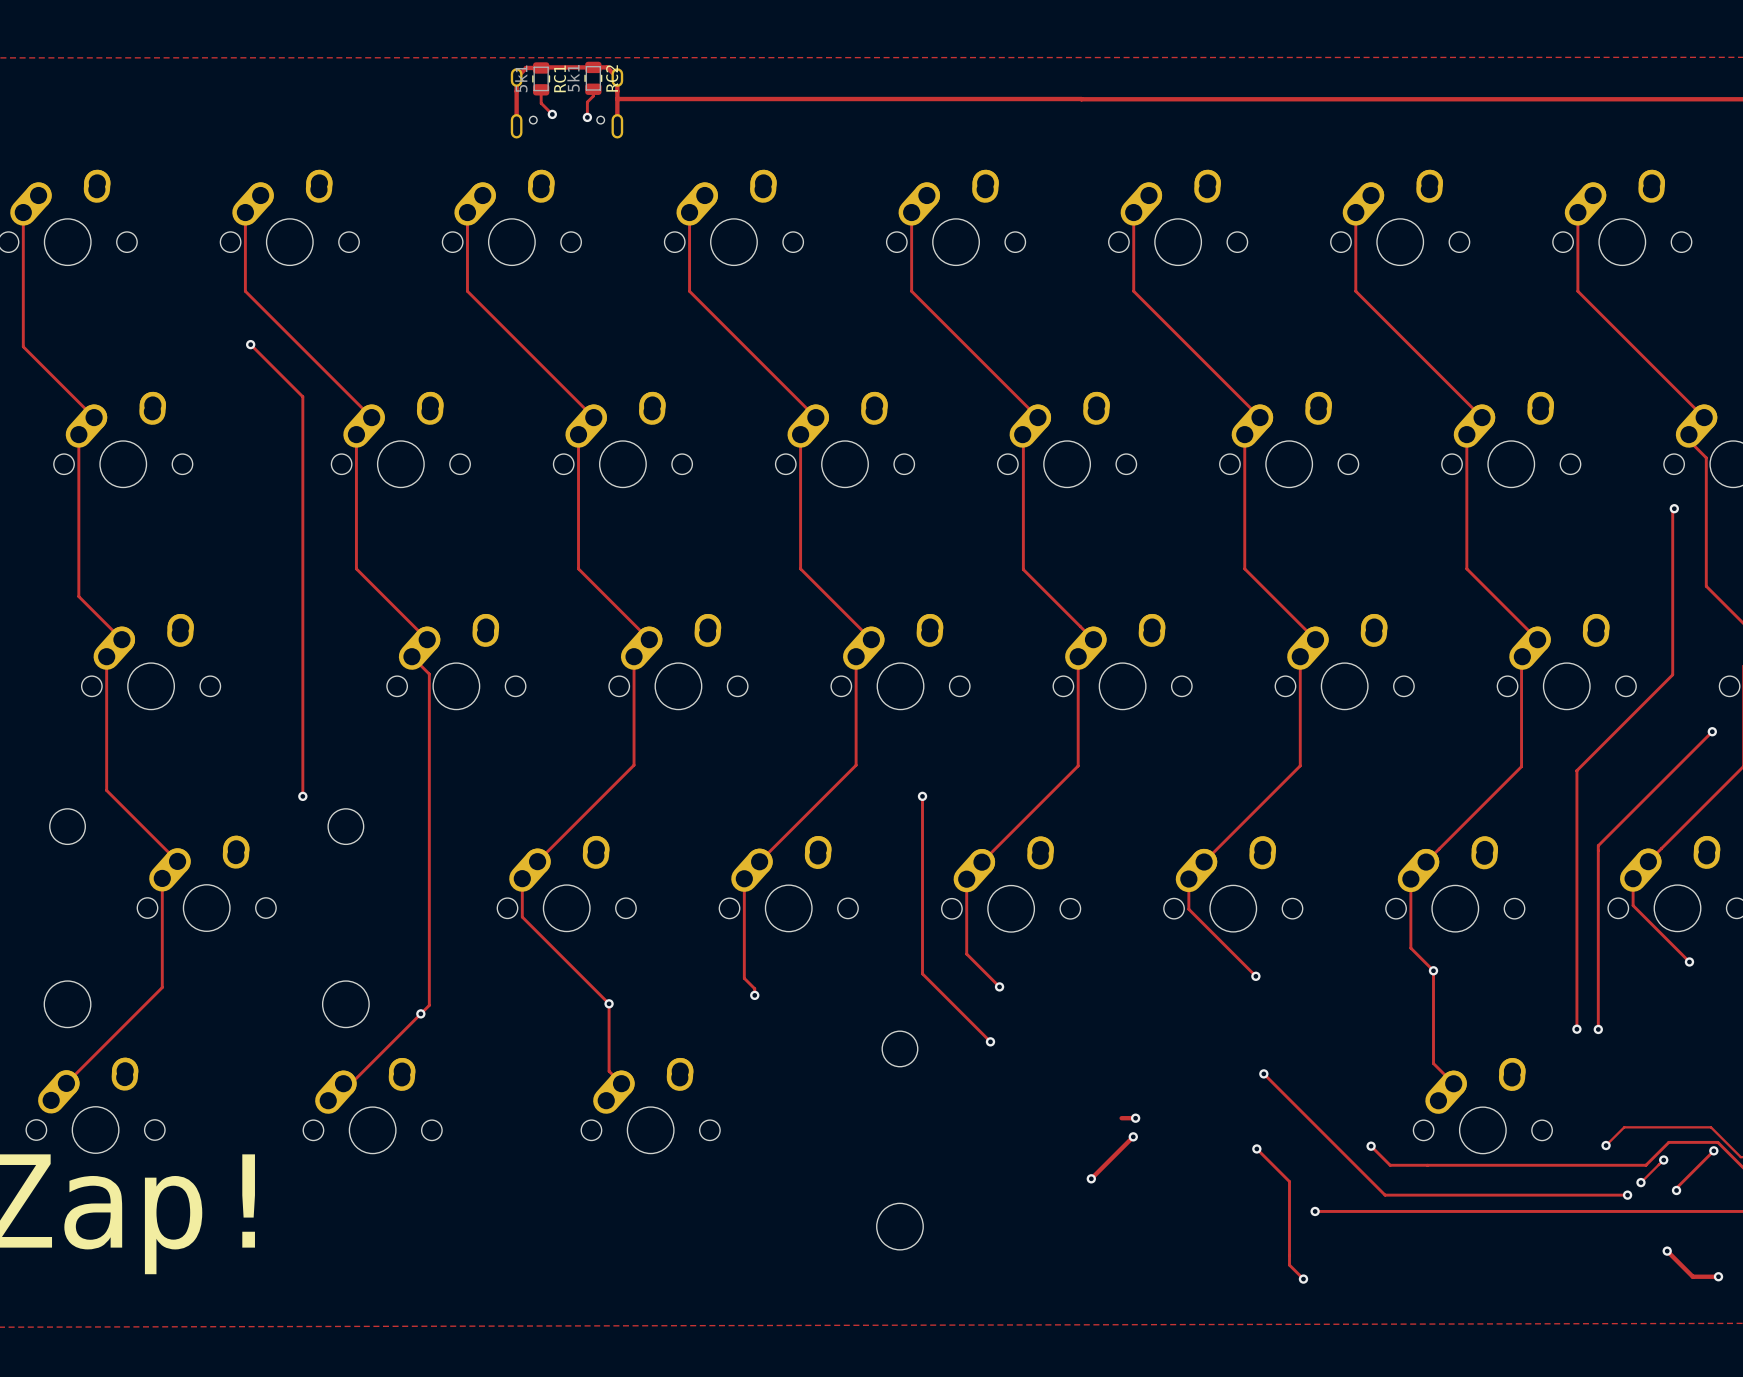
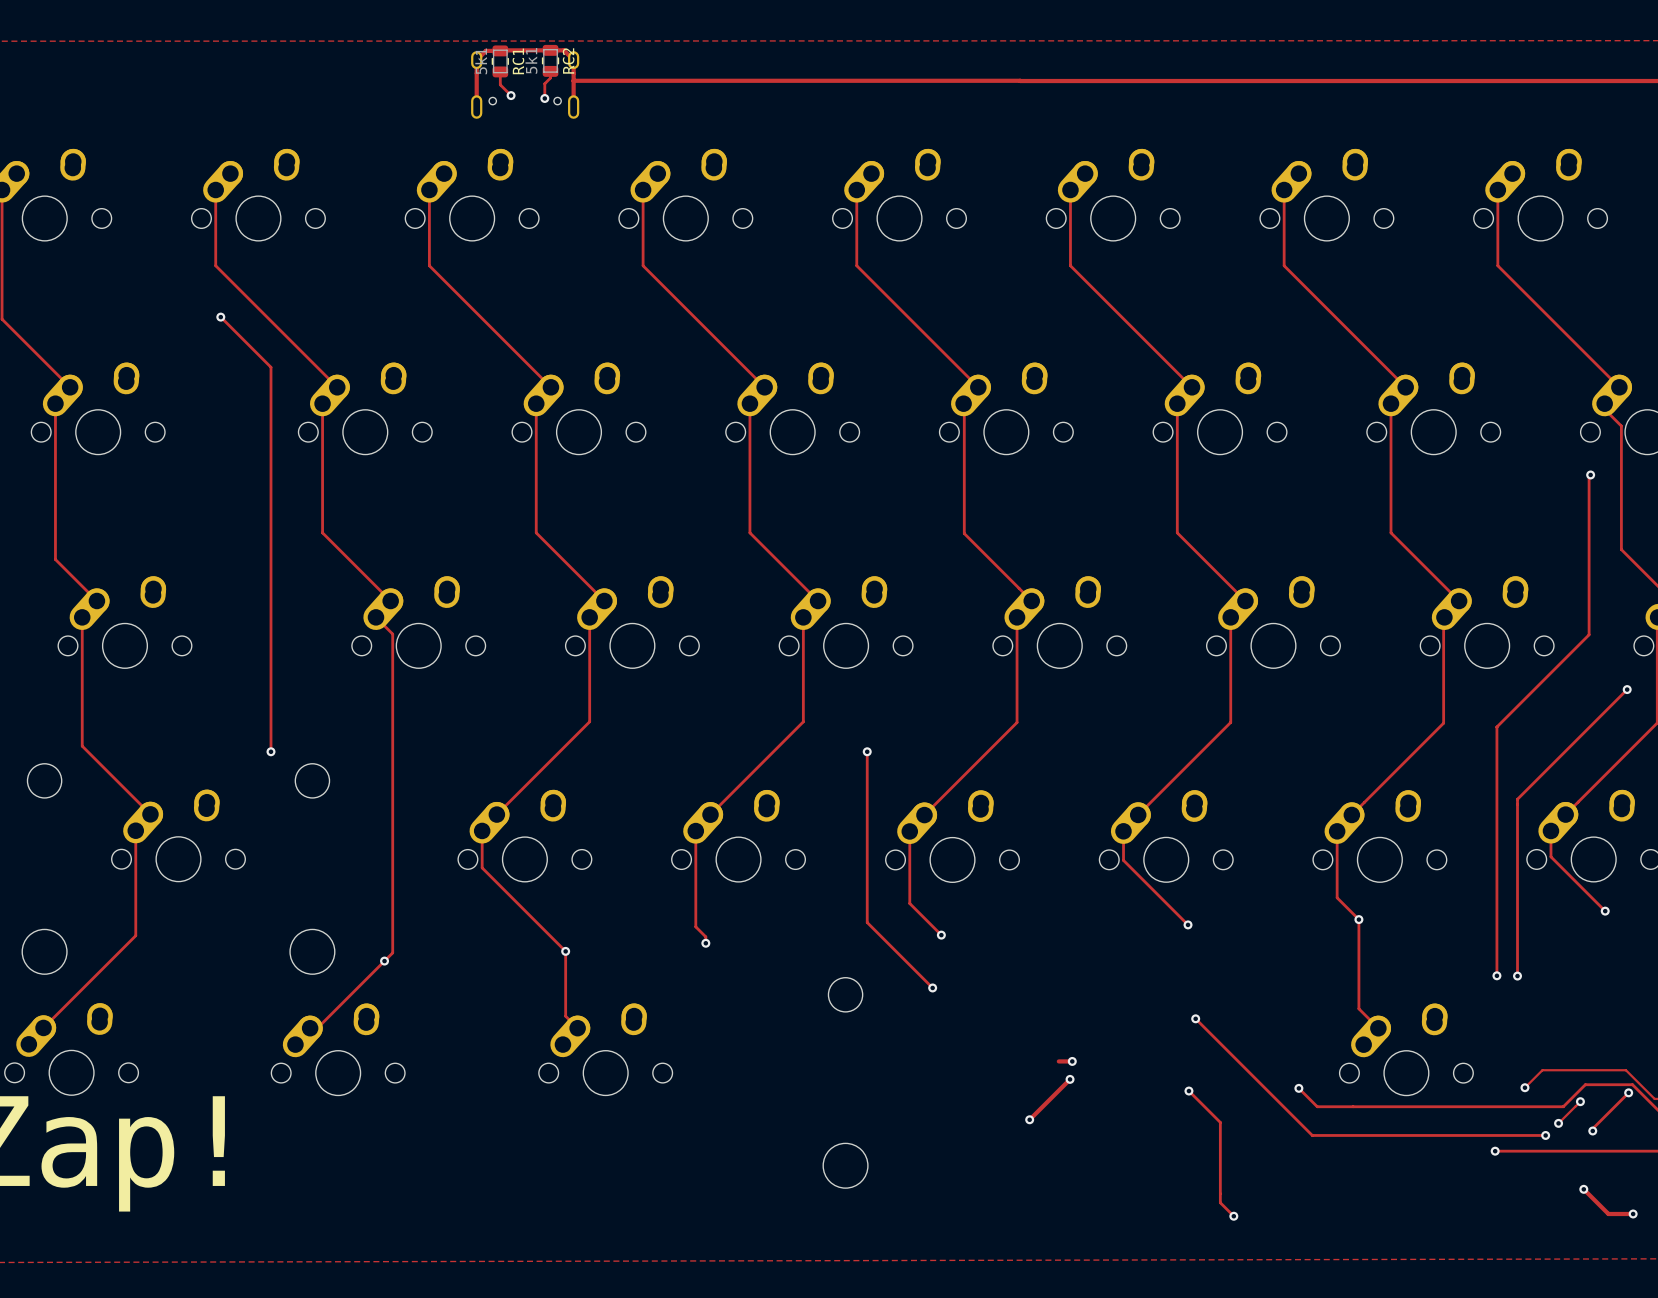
track: (1315, 1211) (1575, 1211) -> none
via: (1315, 1211) -> none
via: none -> (1495, 1151)

